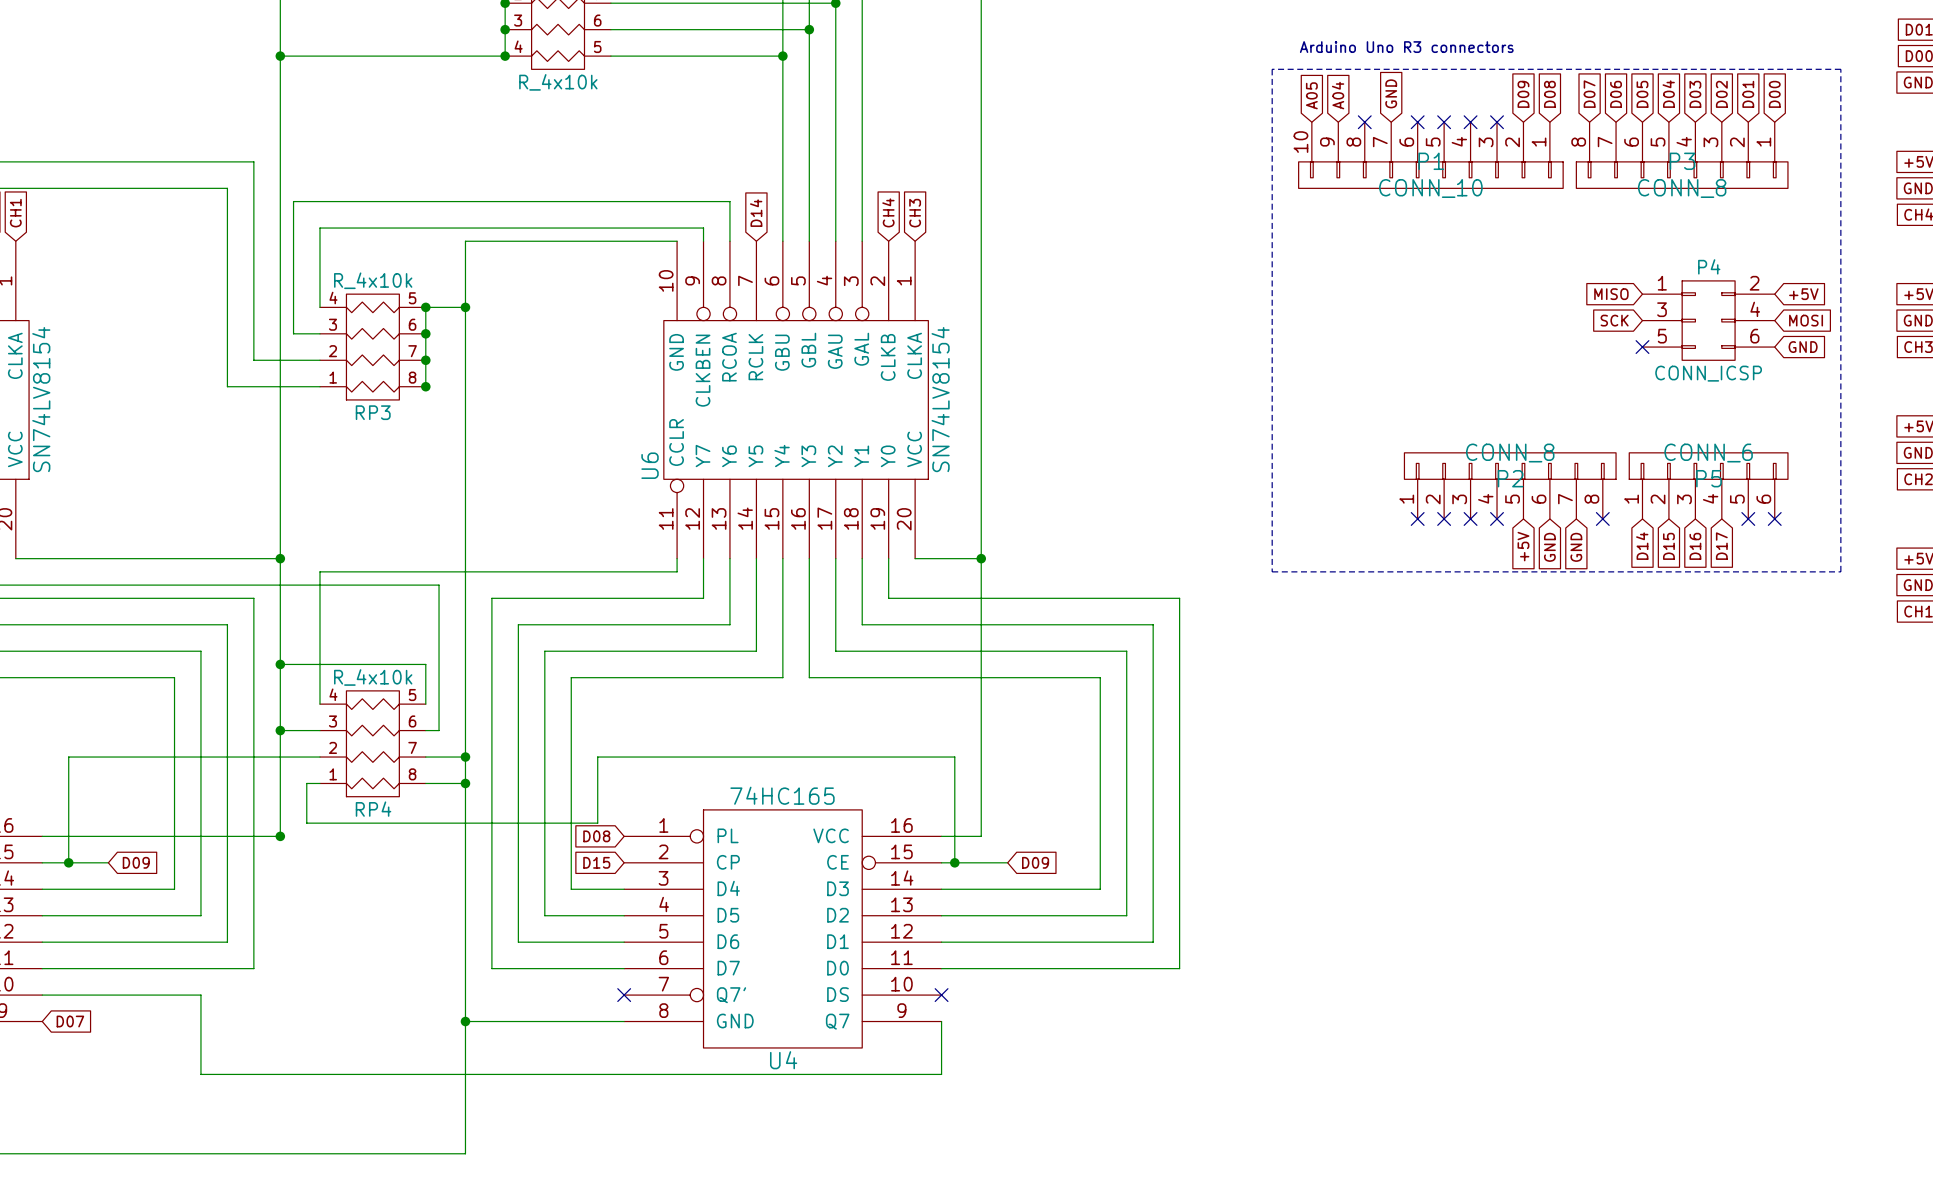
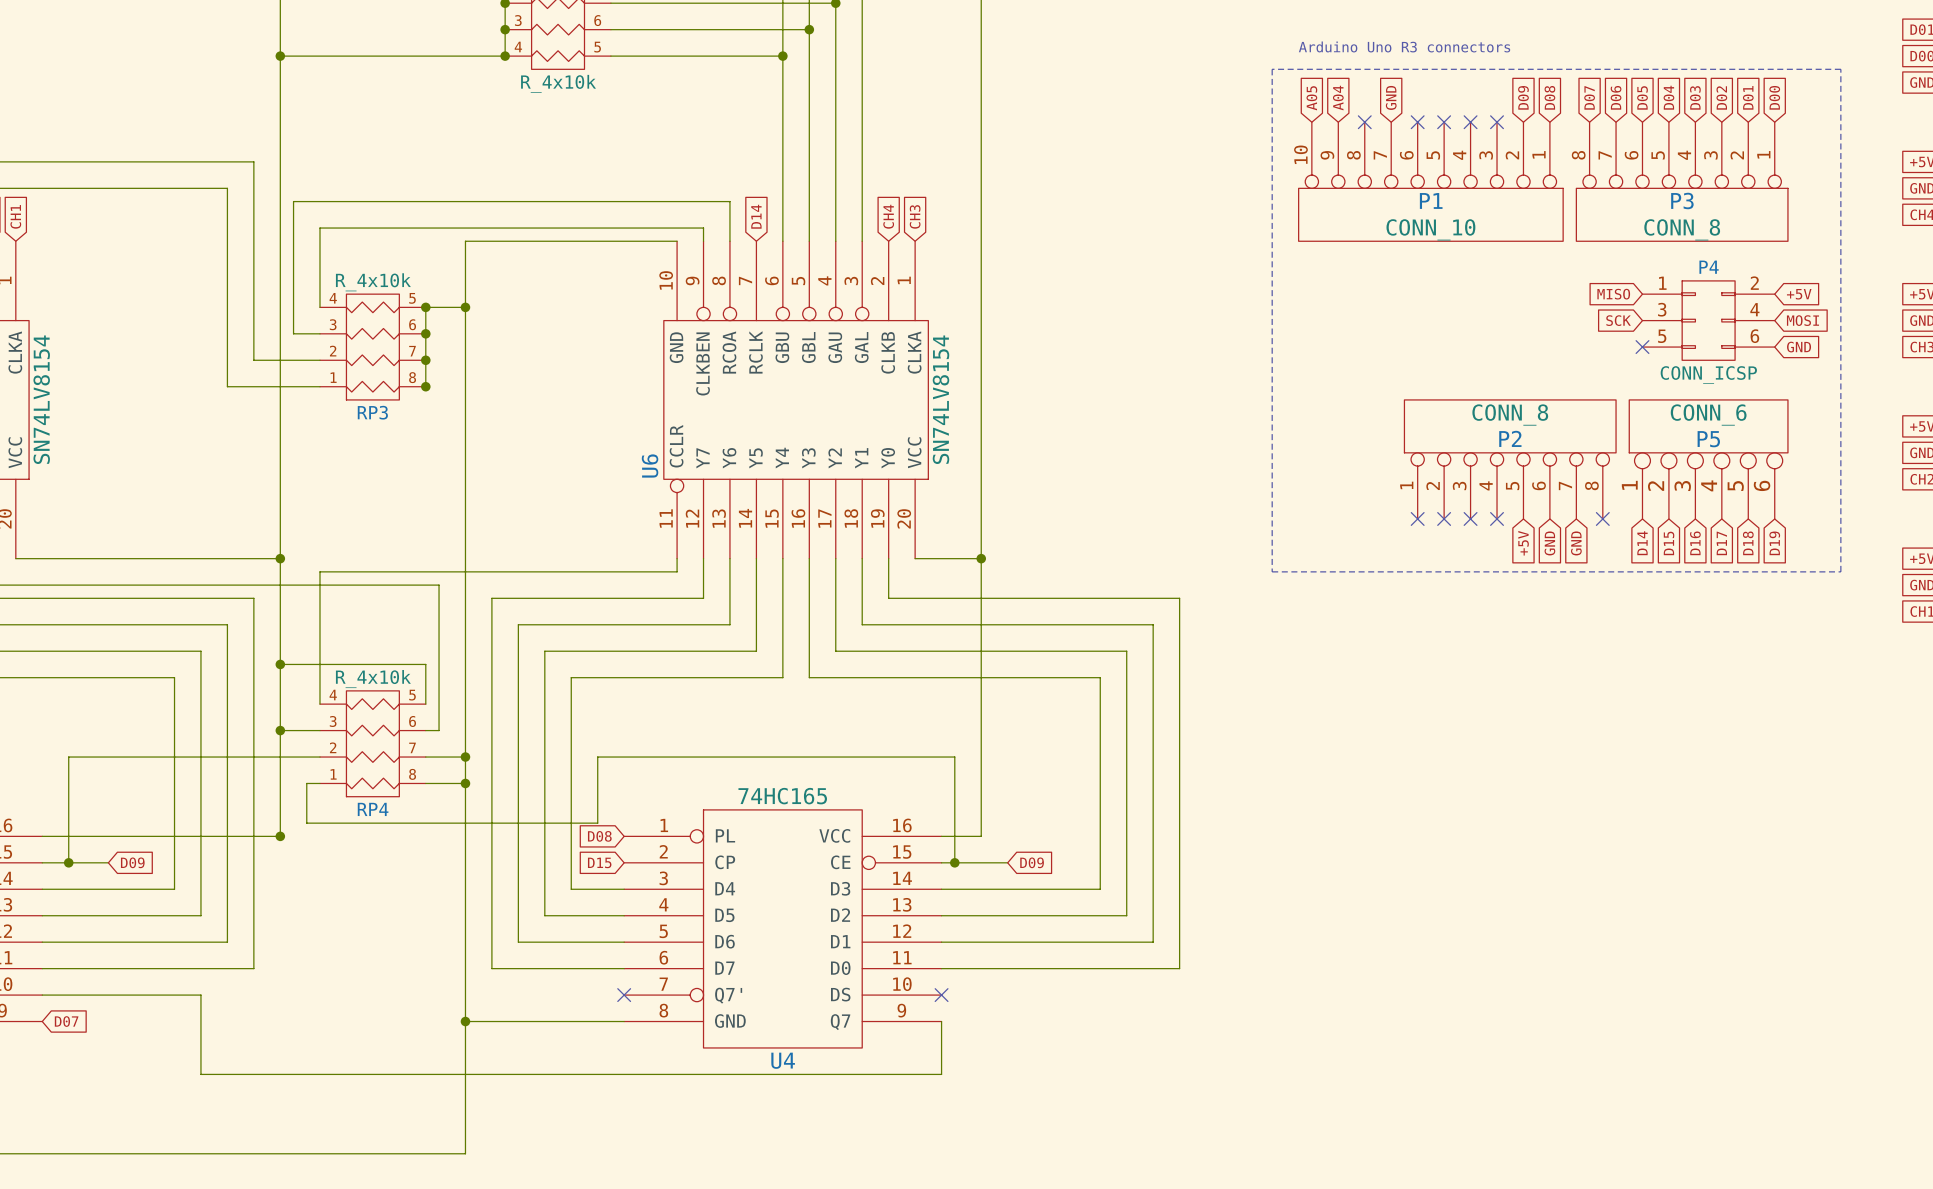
P1 symbol: [1298, 122, 1564, 189] -> [1298, 122, 1564, 242]
P3 symbol: [1576, 122, 1788, 189] -> [1576, 122, 1788, 242]
P2 symbol: [1404, 452, 1617, 519] -> [1404, 399, 1617, 519]
P5 symbol: [1629, 452, 1788, 519] -> [1629, 399, 1788, 519]
no-connect mark: (1748, 518) -> none
no-connect mark: (1774, 518) -> none
global label: none -> D18 (1748, 543)
global label: none -> D19 (1774, 543)

